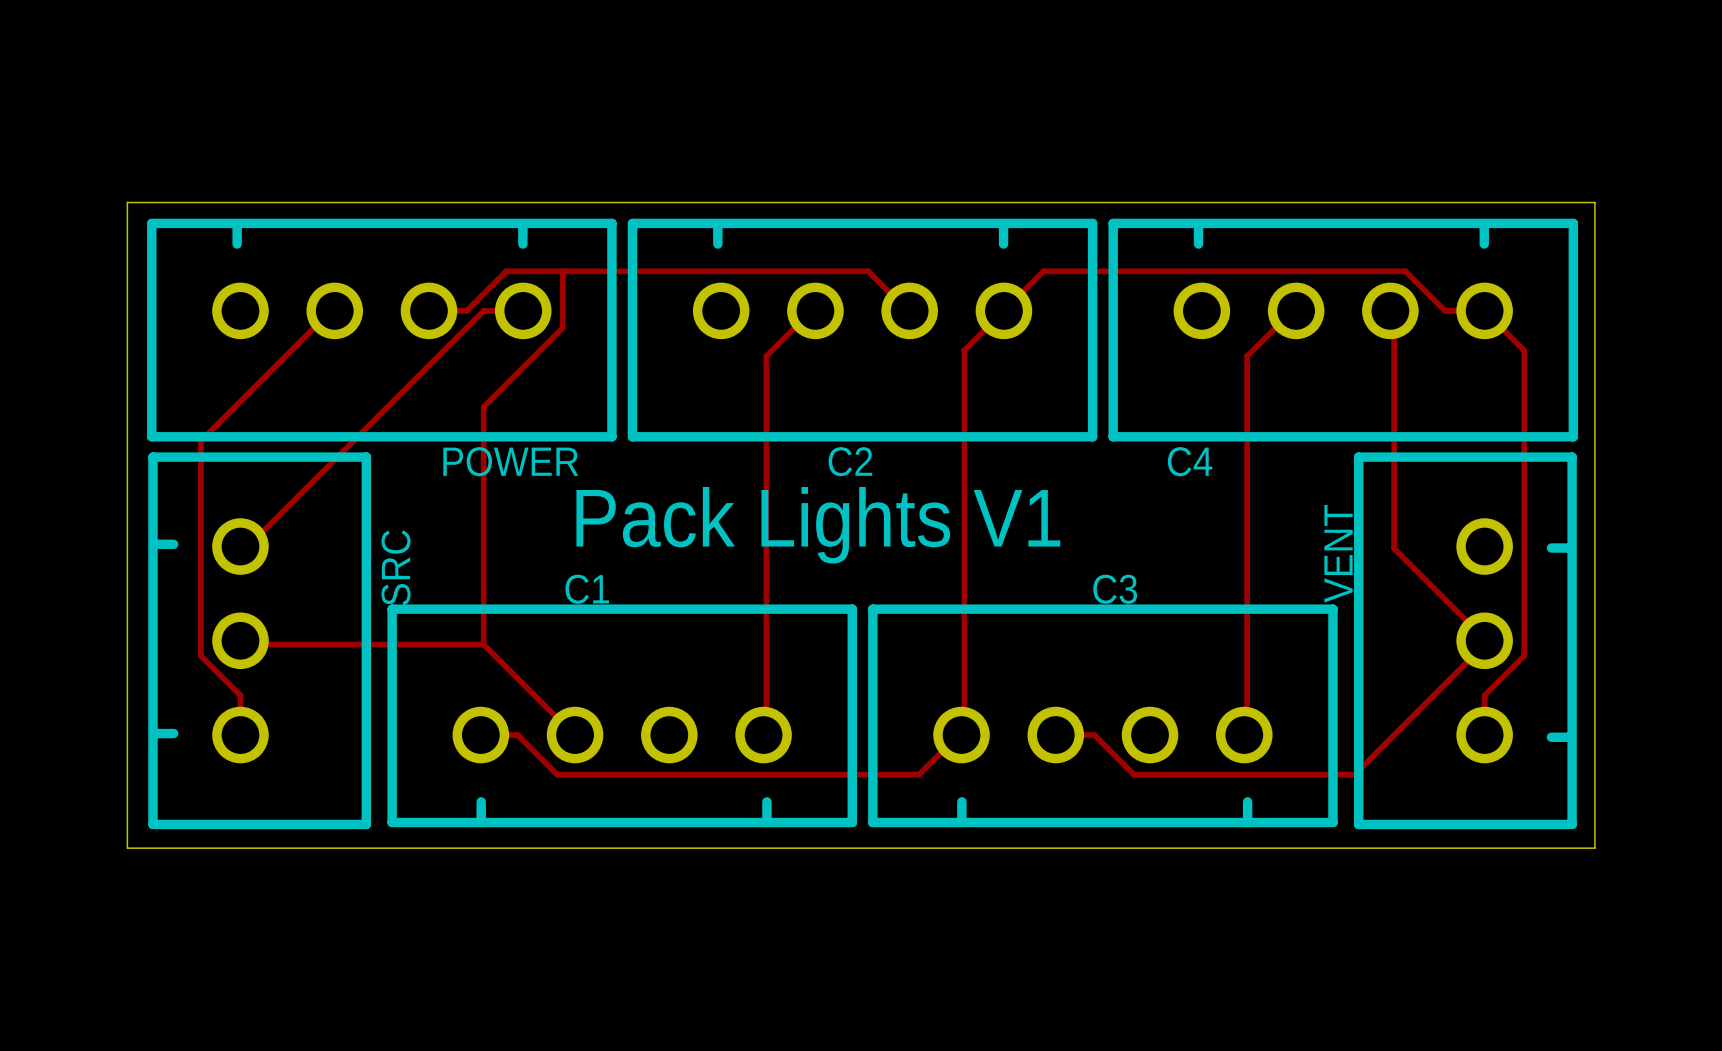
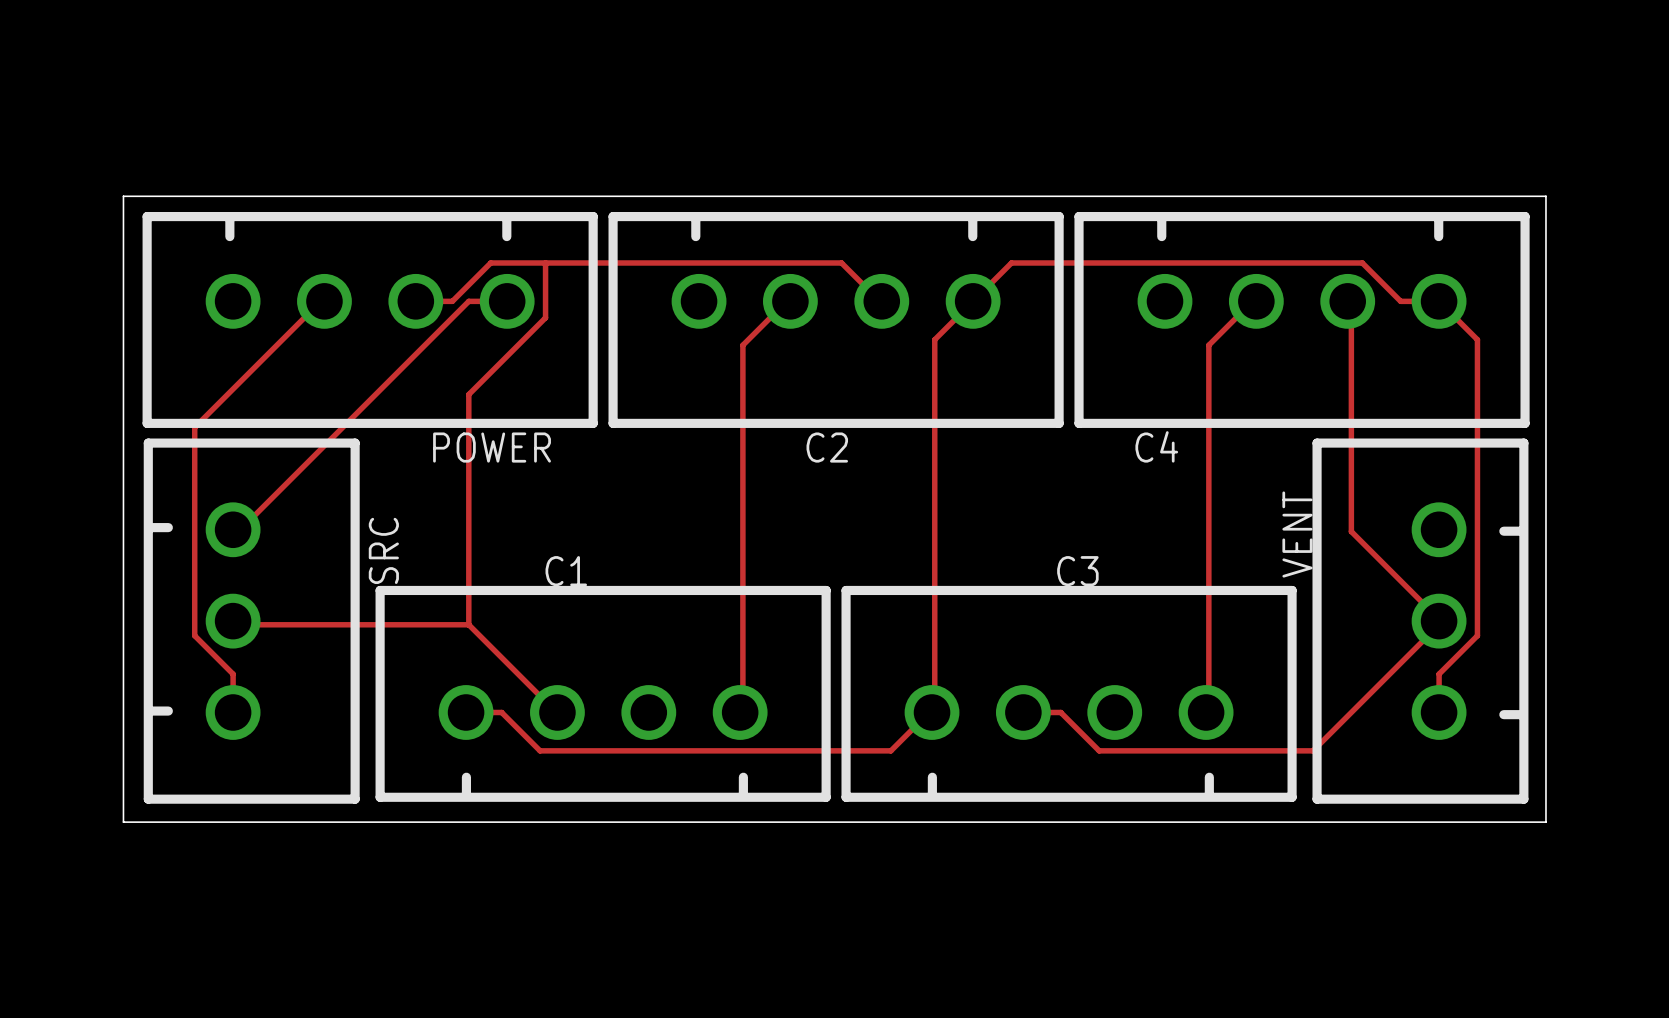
text: Pack Lights V1 (818, 525) -> none

